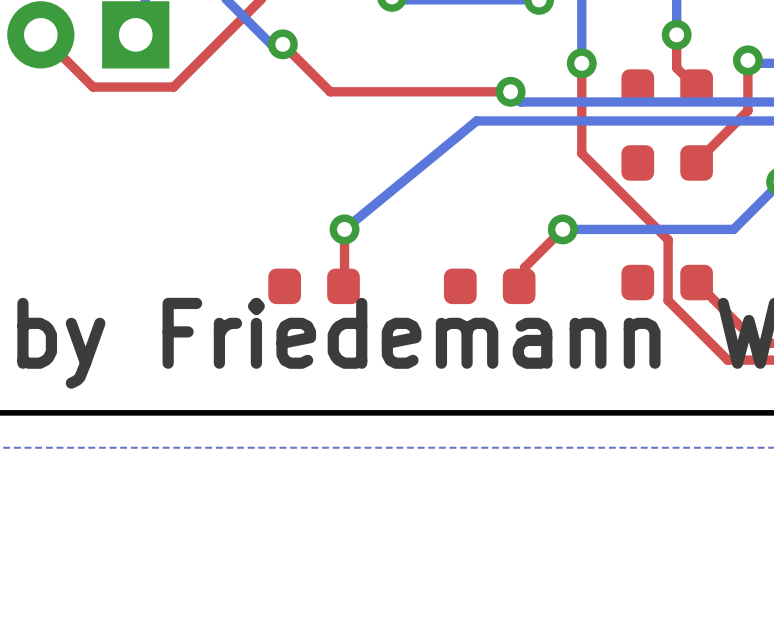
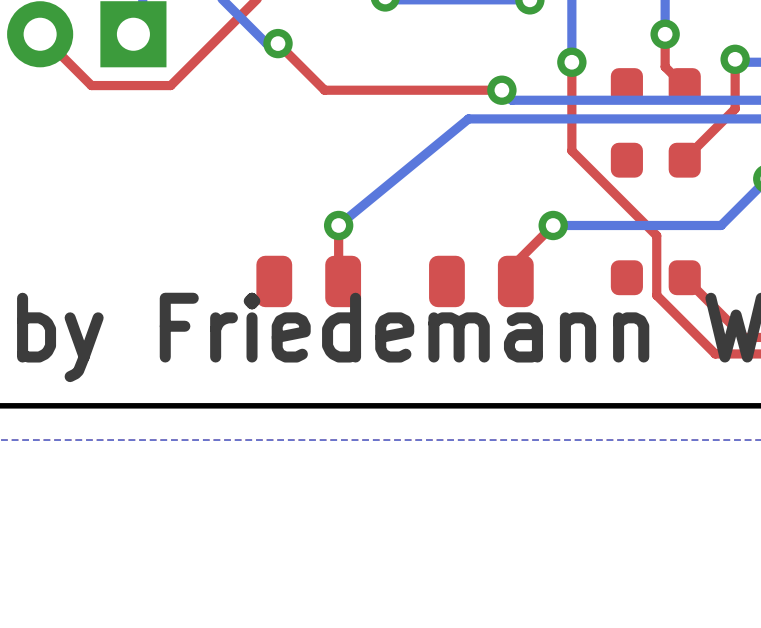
part footprint: [268, 268, 360, 305] -> [256, 255, 362, 308]
part footprint: [443, 268, 536, 305] -> [429, 255, 534, 308]

